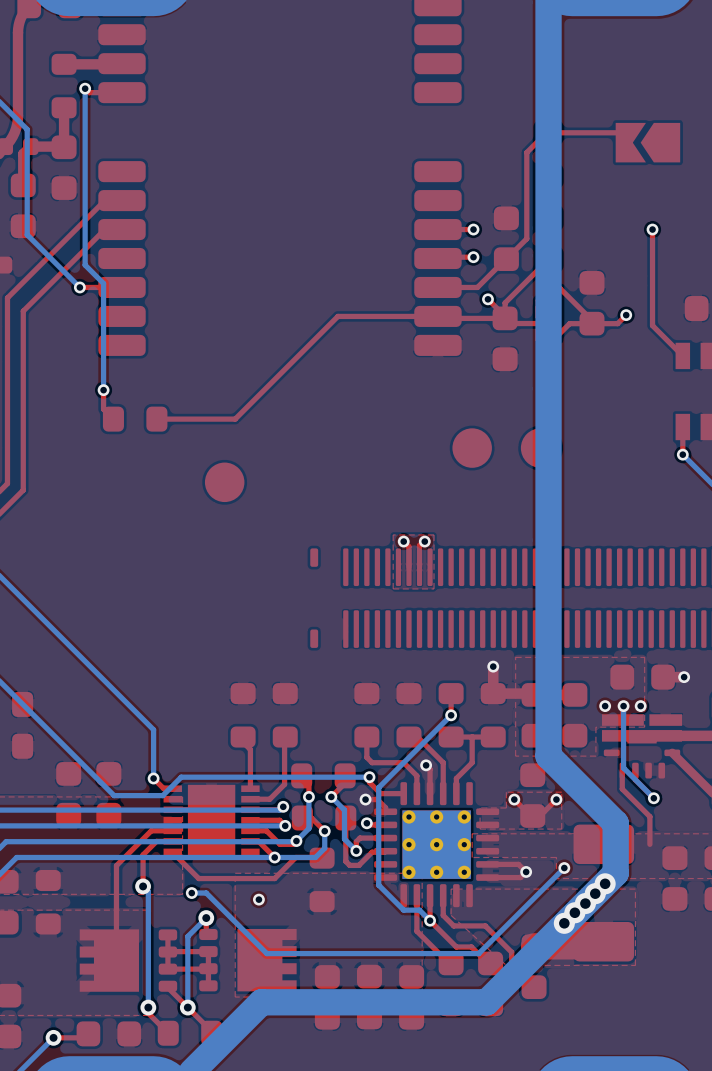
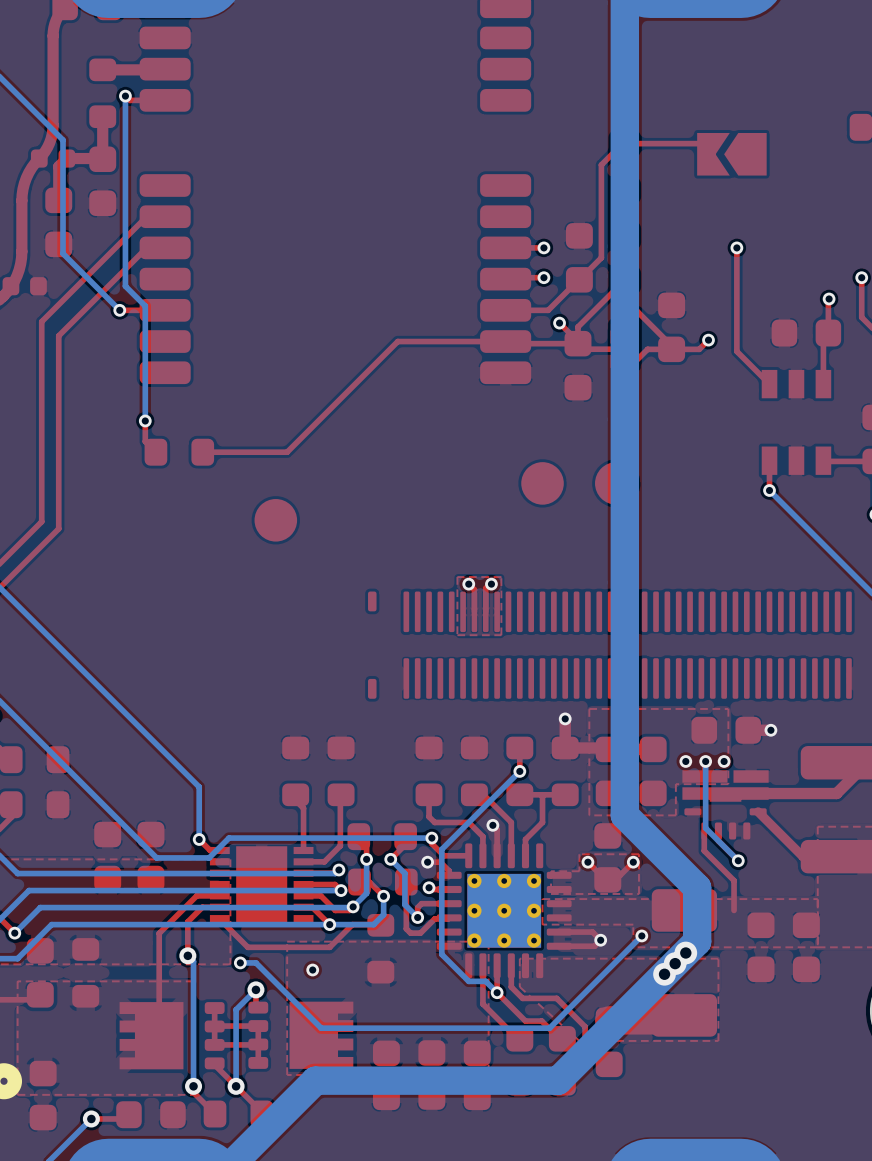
via: (574, 912) -> none
via: (564, 923) -> none

